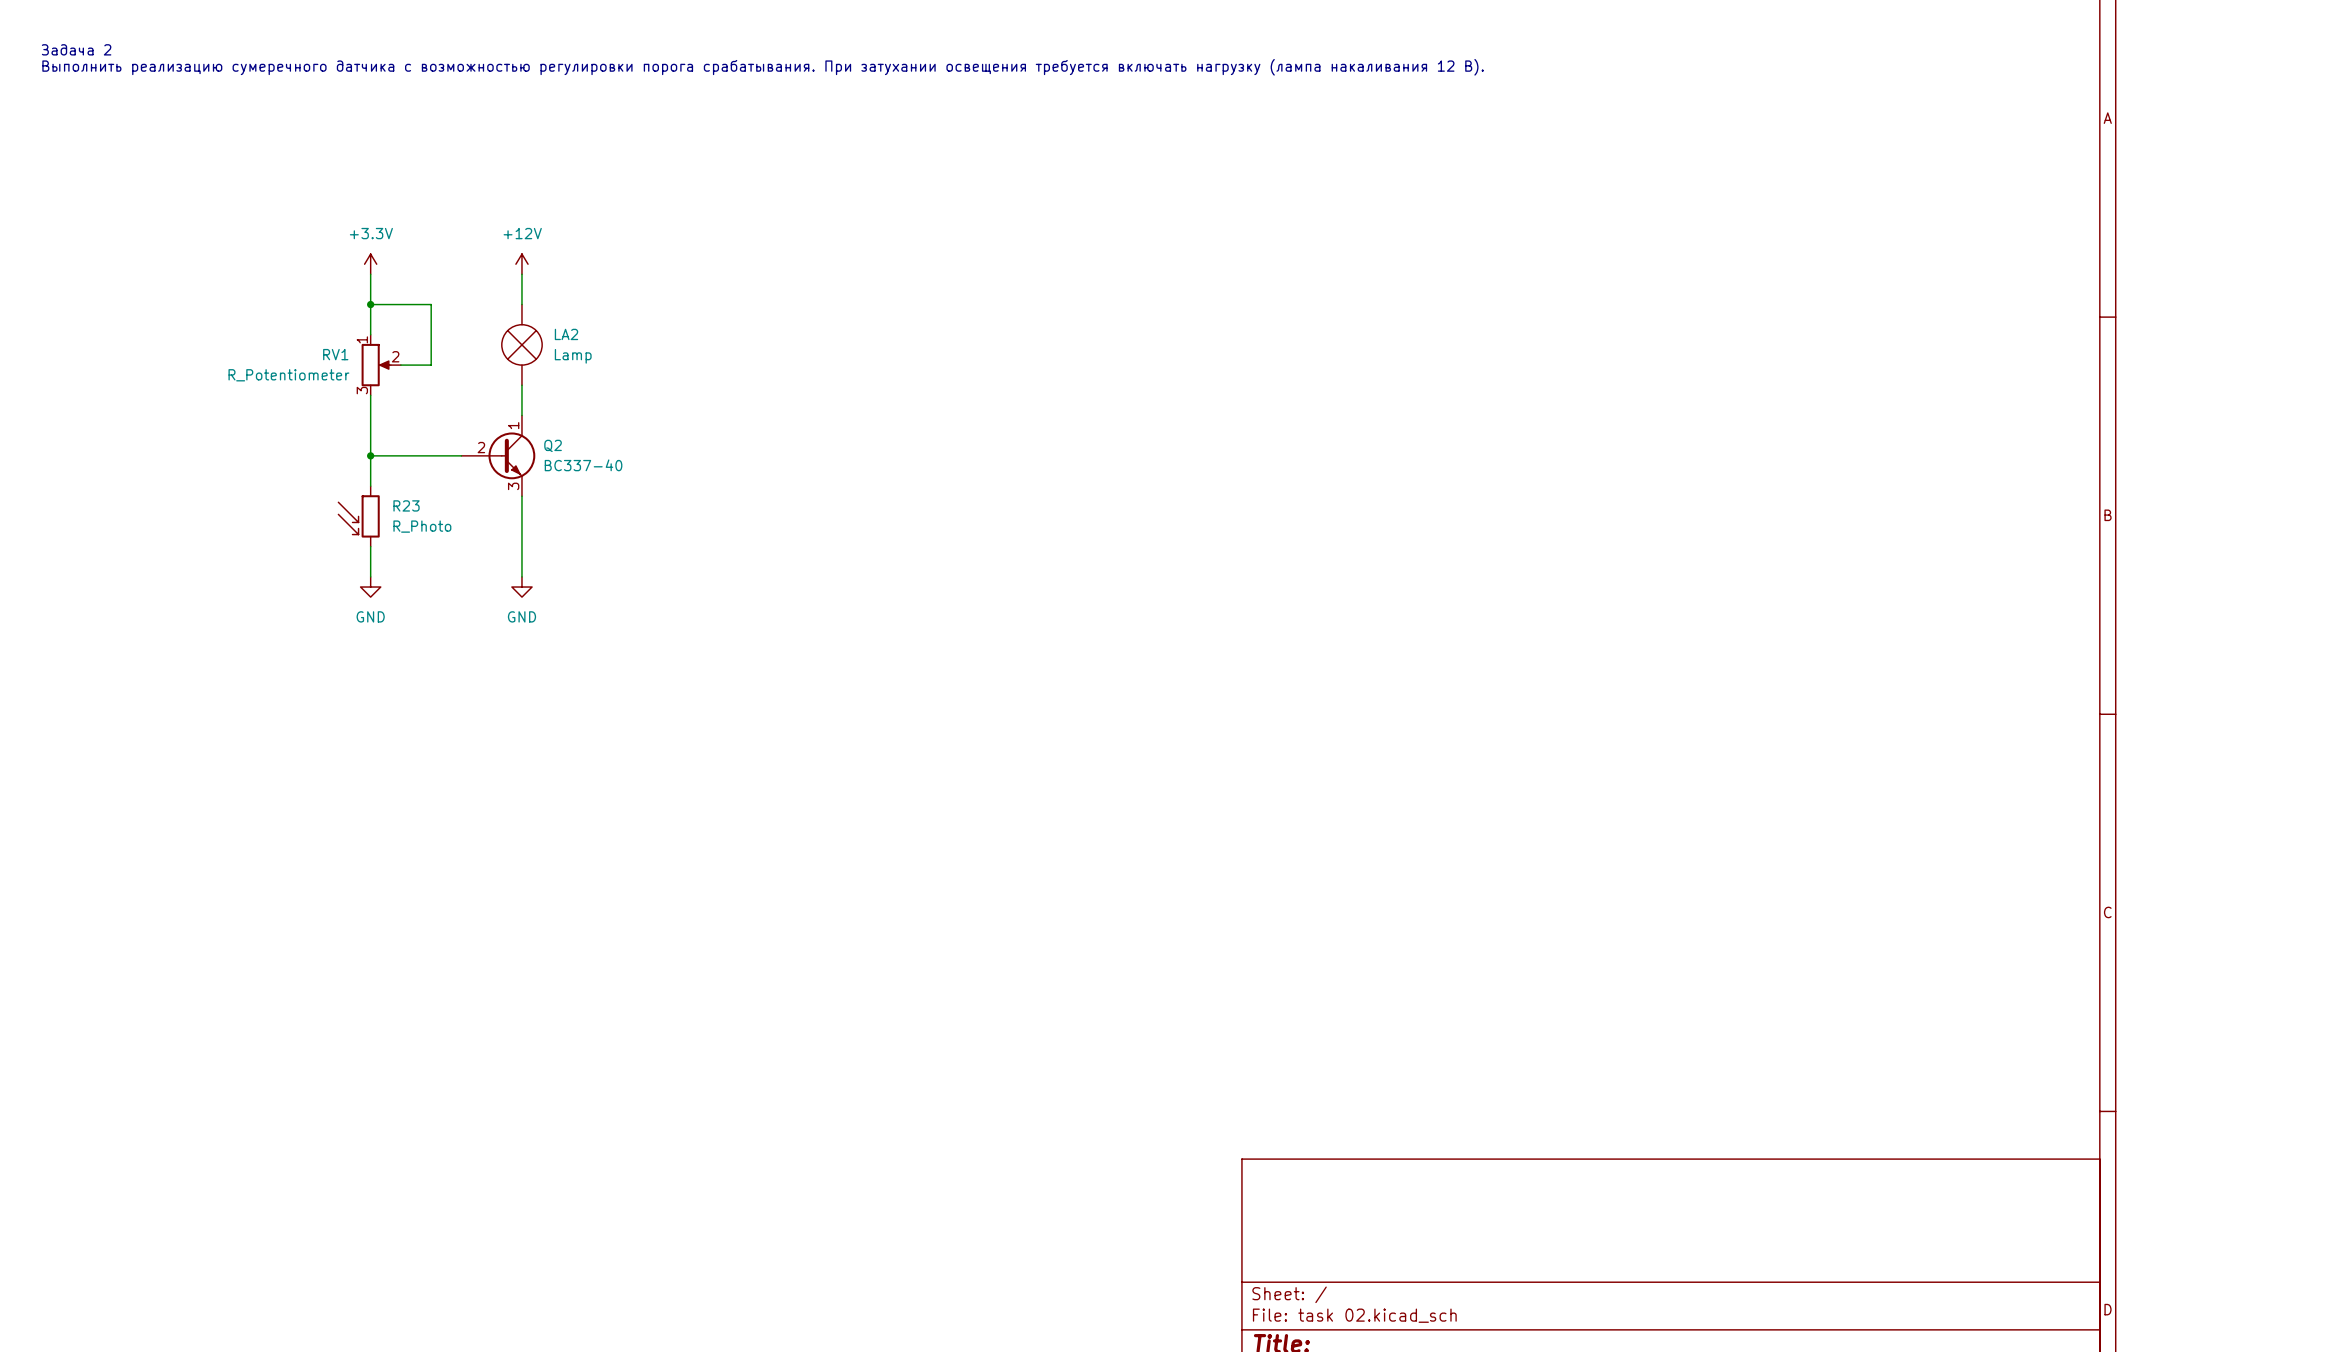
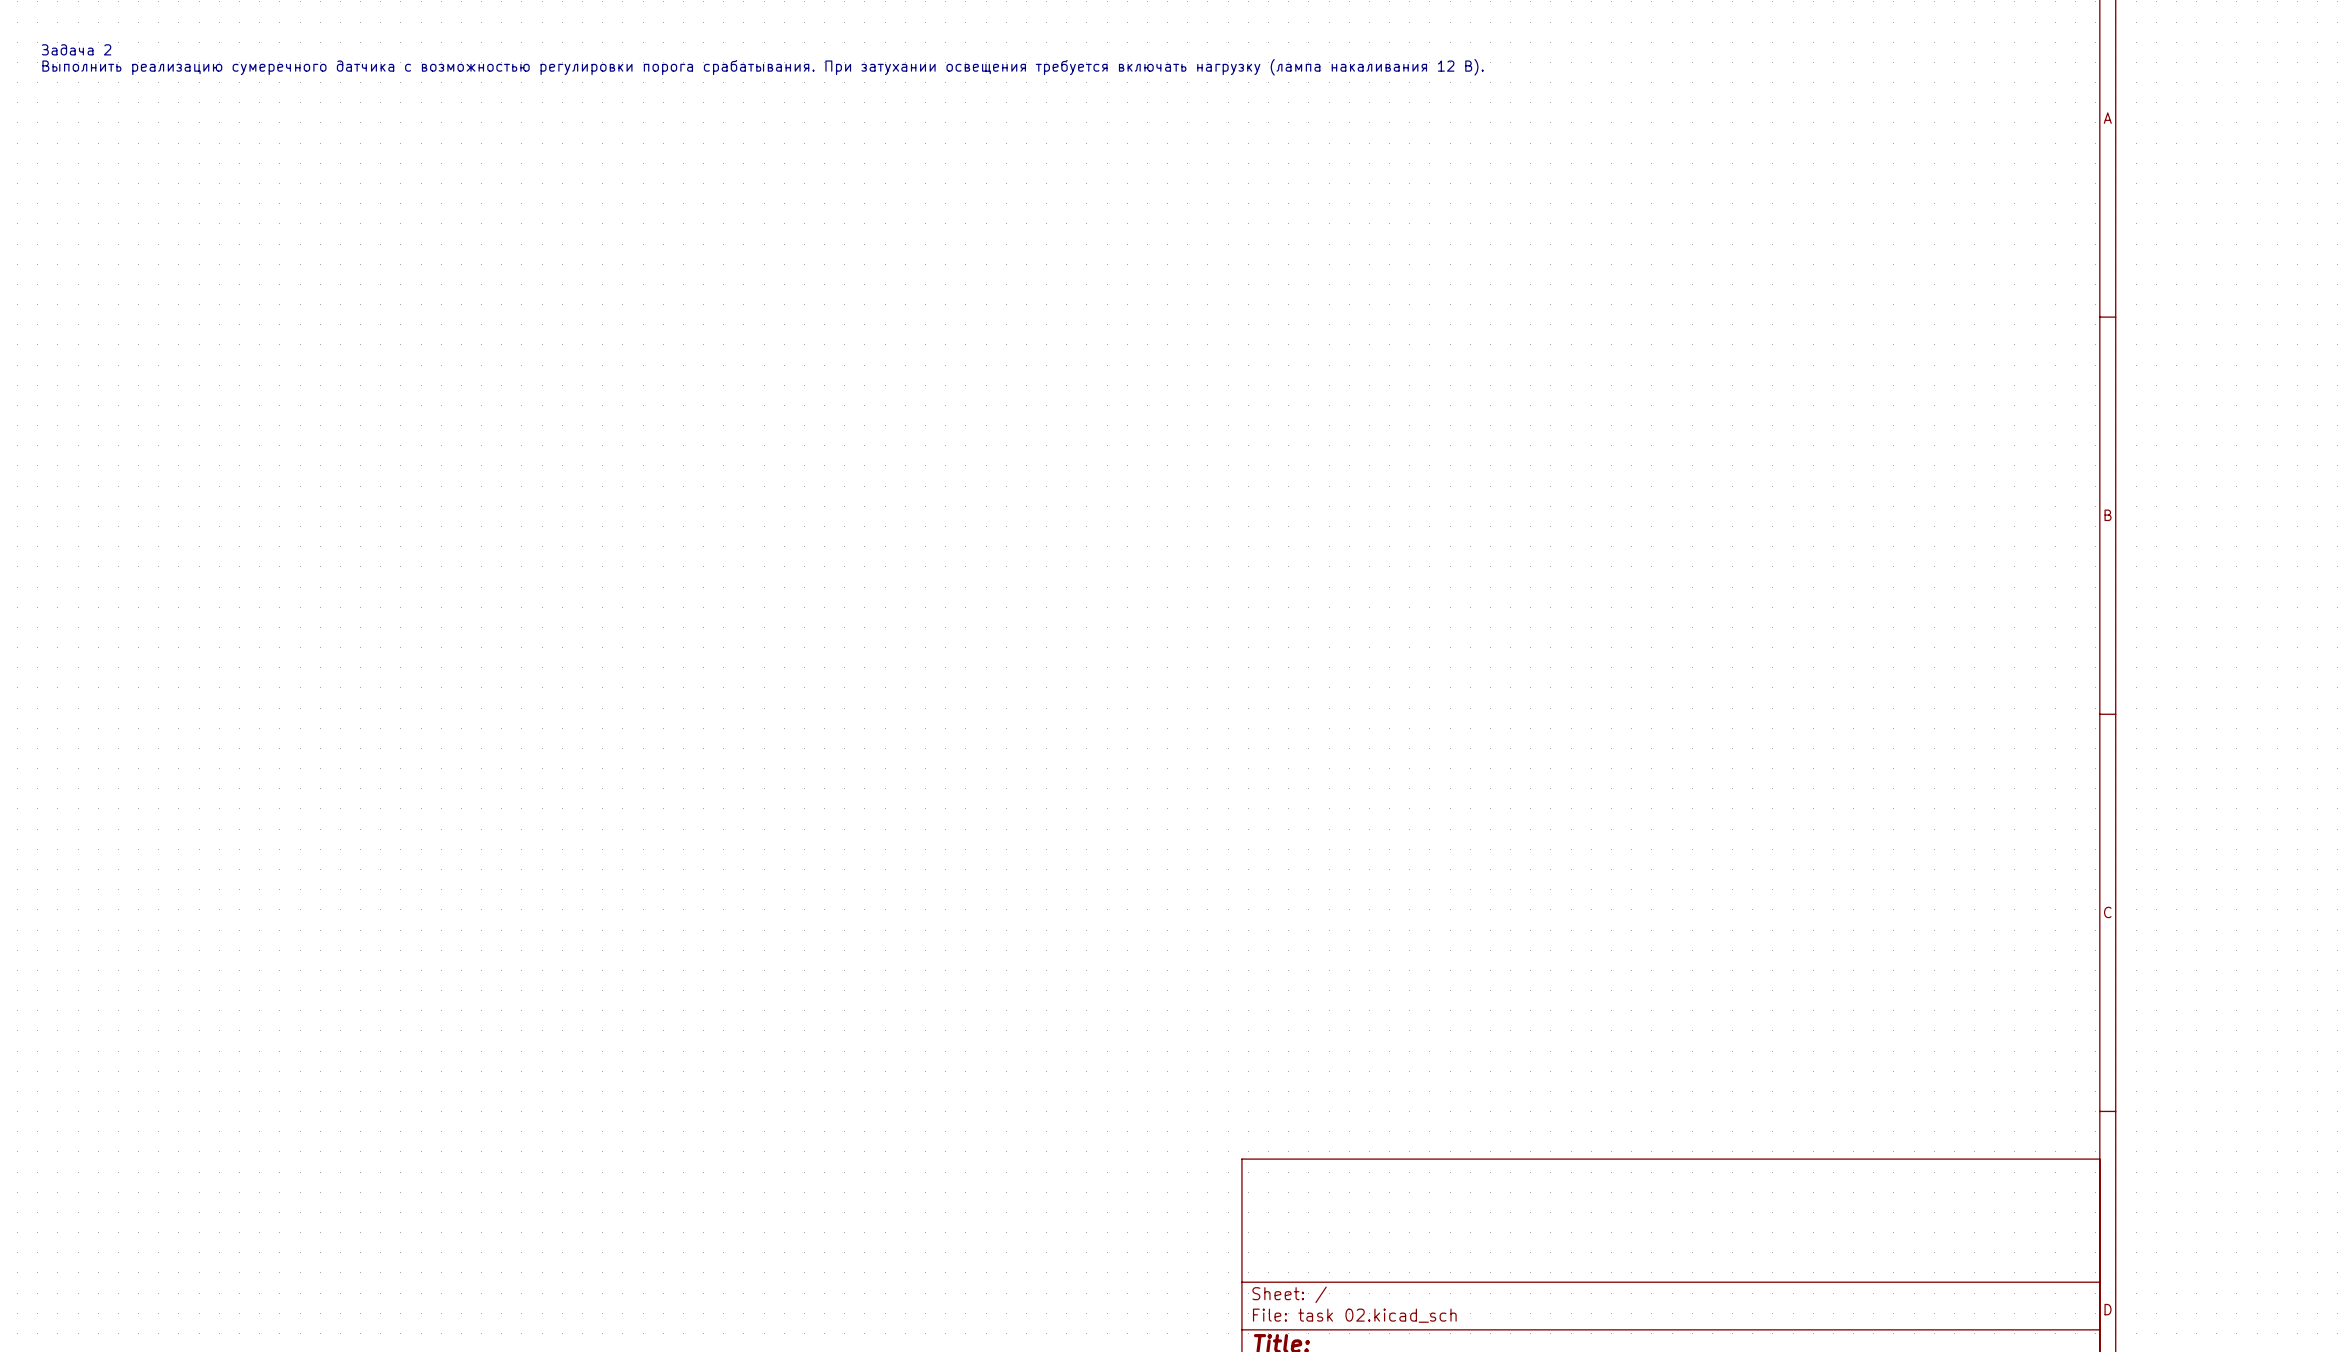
power symbol: +3.3V (370, 264) -> none
power symbol: +12V (521, 264) -> none
wire: (370, 274) (370, 334) -> none
wire: (521, 274) (521, 304) -> none
wire: (370, 304) (431, 304) (431, 365) (400, 365) -> none
junction: (370, 304) -> none
LA2: Lamp (521, 344) -> none
RV1: R_Potentiometer (381, 365) -> none
wire: (521, 385) (521, 415) -> none
wire: (370, 395) (370, 486) -> none
wire: (370, 455) (461, 455) -> none
junction: (370, 455) -> none
Q2: BC337-40 (498, 455) -> none
wire: (521, 496) (521, 576) -> none
R23: R_Photo (359, 516) -> none
wire: (370, 546) (370, 576) -> none
power symbol: GND (370, 587) -> none
power symbol: GND (521, 587) -> none

